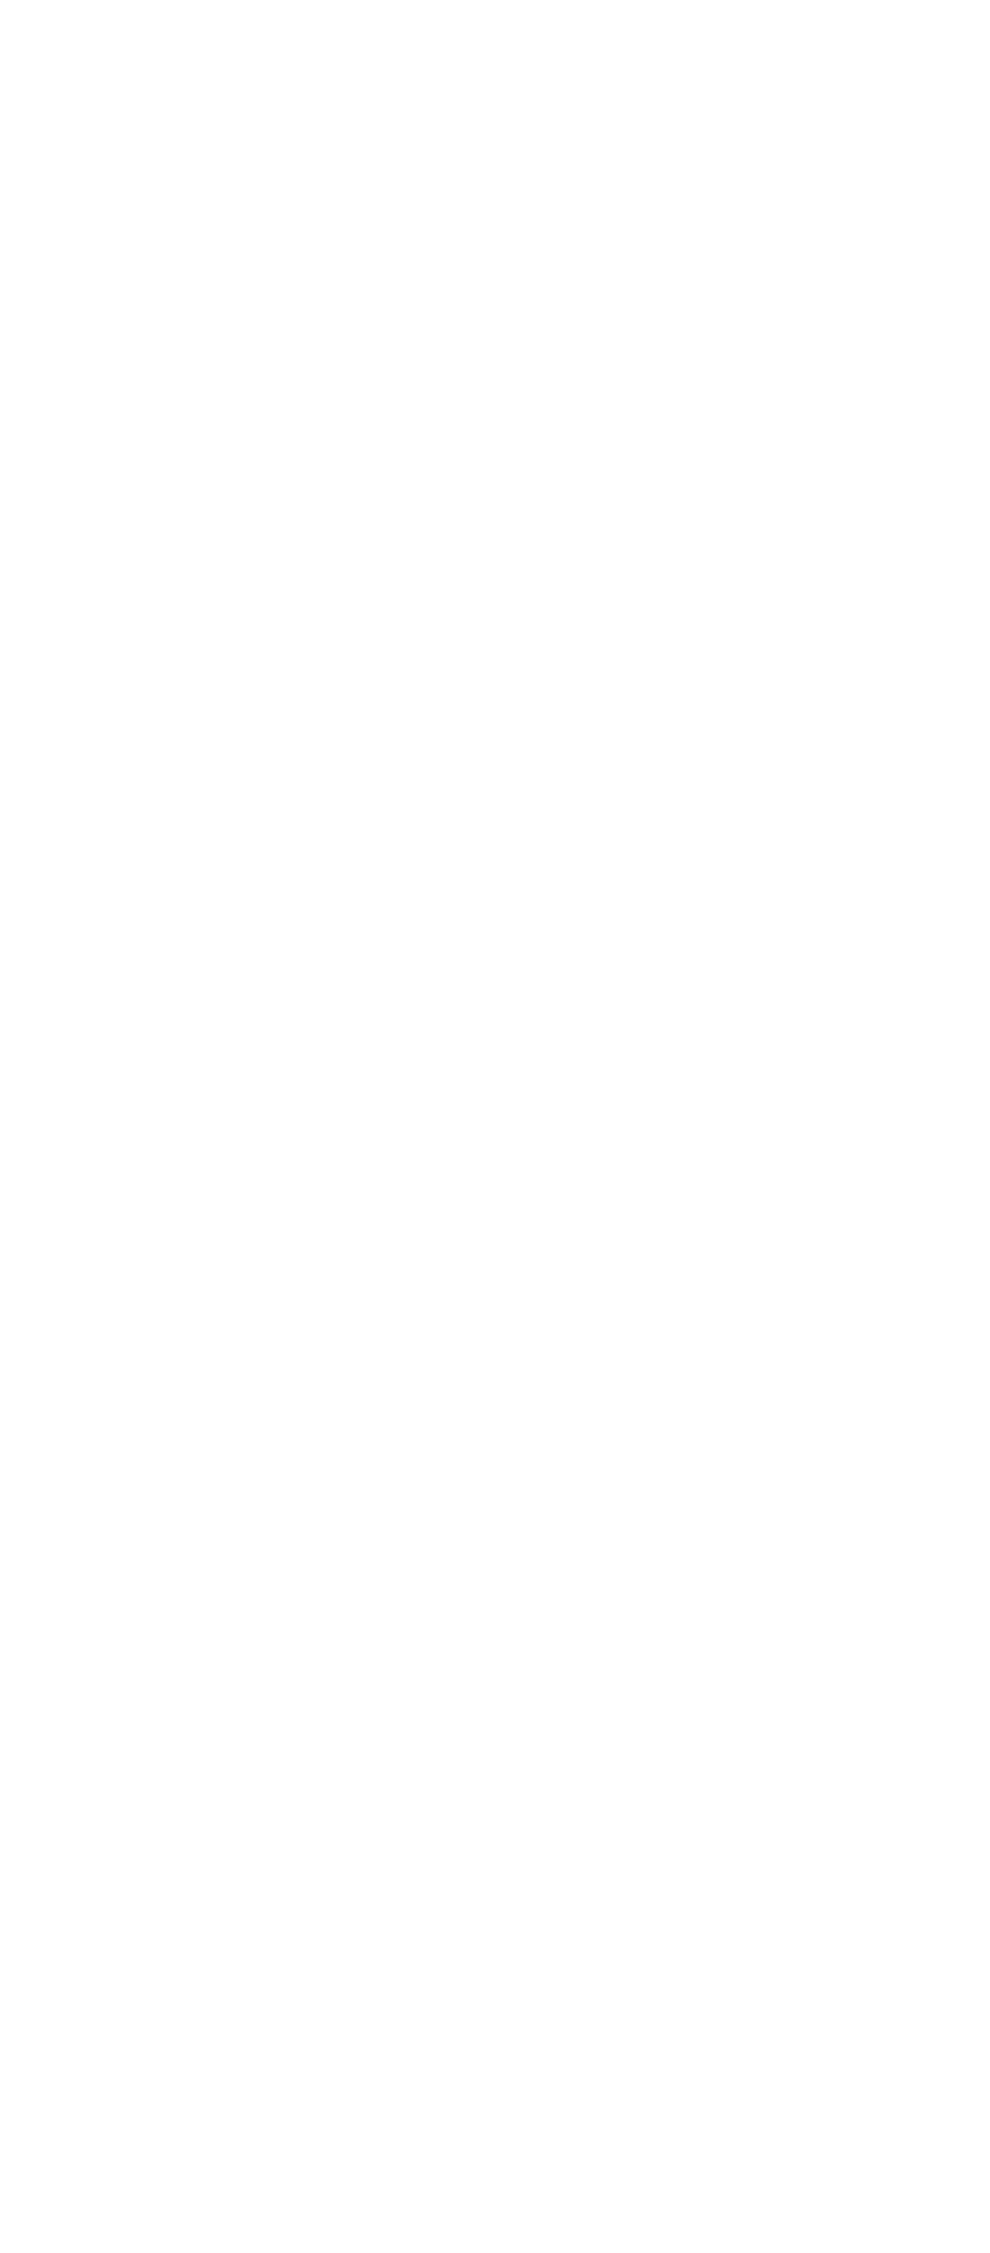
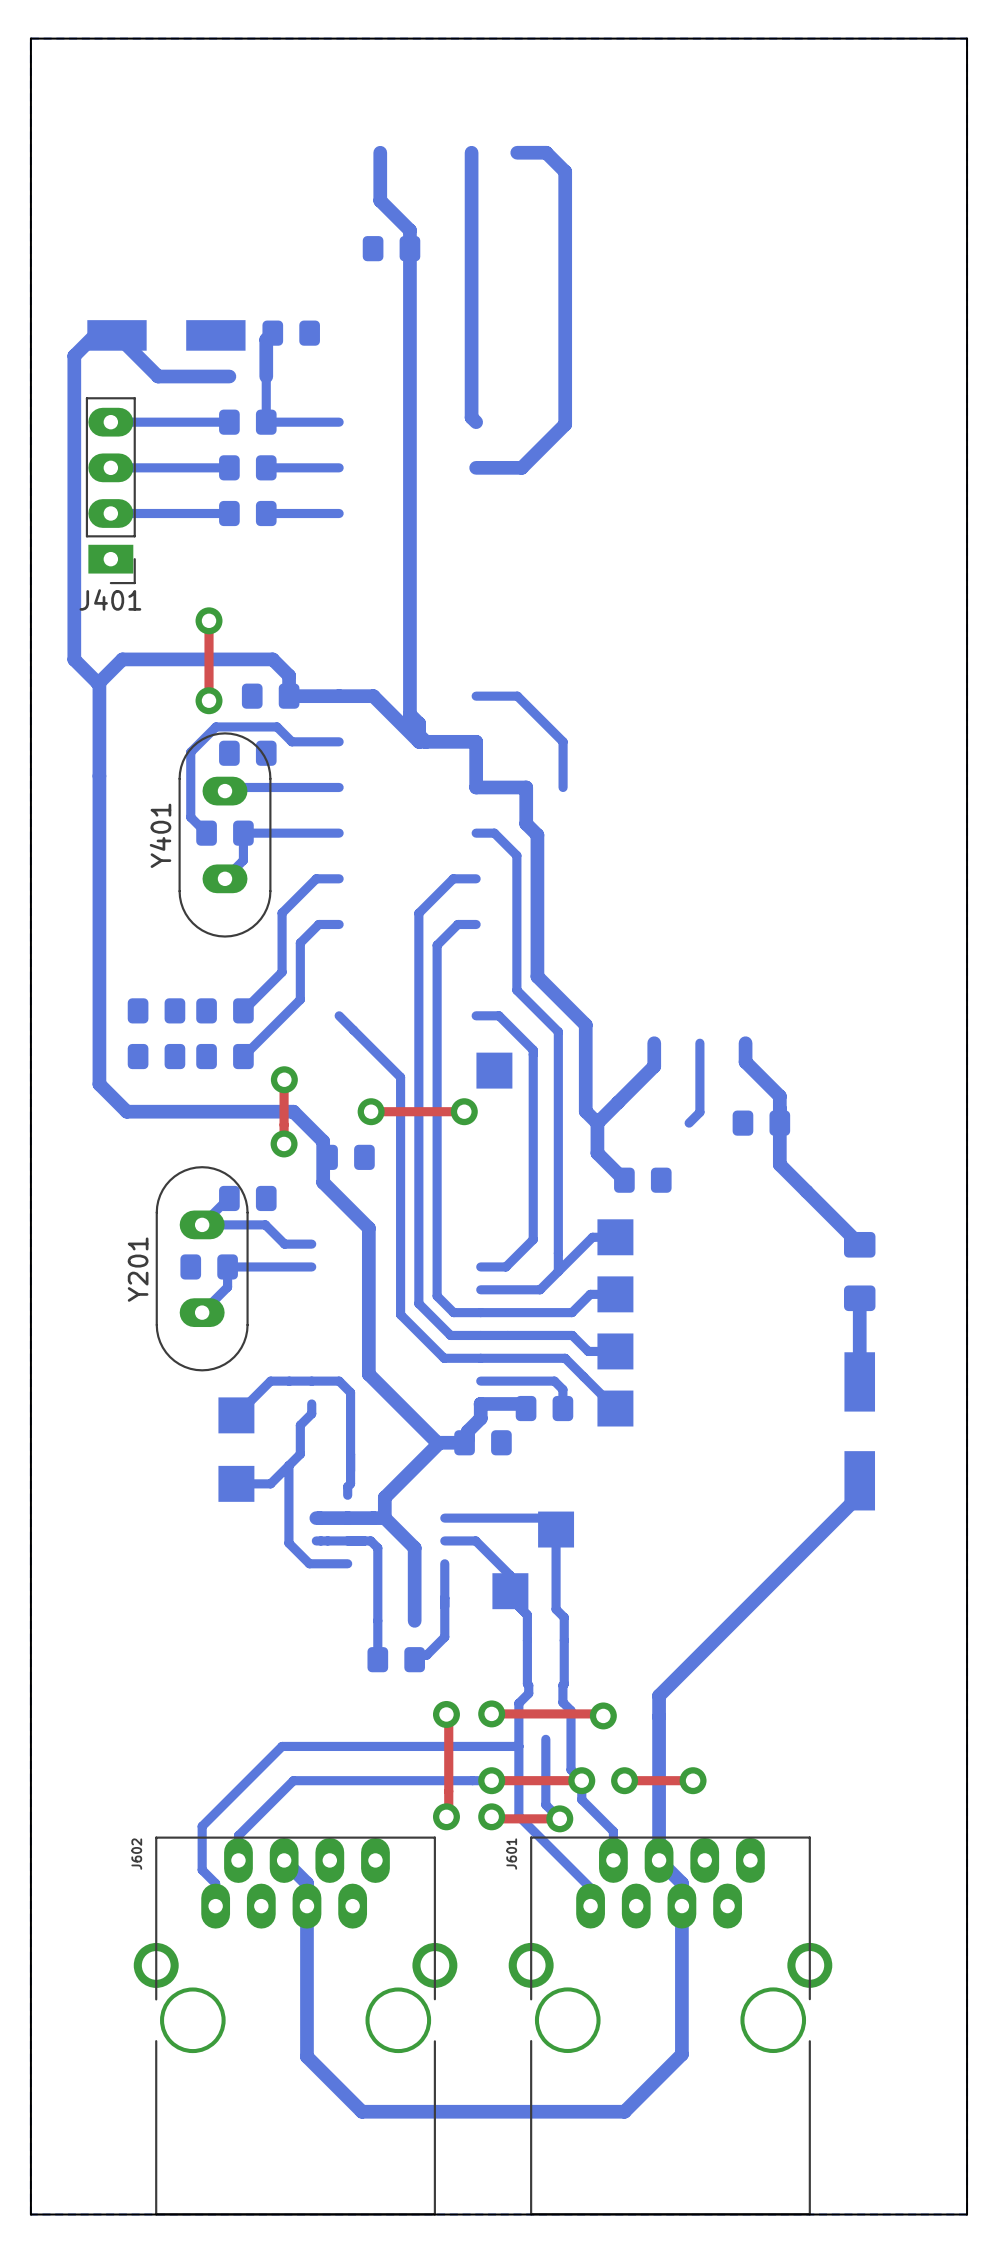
board edge: none -> (30, 38) (967, 38) (967, 2214) (30, 2214) (30, 38)
bottom track: none -> (380, 152) (380, 200) (409, 230) (409, 714) (419, 723) (419, 741)
bottom track: none -> (471, 152) (471, 417) (476, 422)
bottom track: none -> (517, 152) (546, 152) (565, 171) (565, 424) (521, 467) (476, 467)
part: none -> (391, 248)
bottom track: none -> (272, 333) (266, 339) (266, 422) (339, 422)
part: none -> (291, 333)
part: none -> (166, 335)
bottom track: none -> (229, 376) (158, 376) (116, 335) (94, 335) (74, 355) (74, 659) (97, 682) (99, 682)
bottom track: none -> (110, 422) (229, 422)
part: none -> (247, 422)
bottom track: none -> (110, 467) (229, 467)
part: none -> (247, 467)
bottom track: none -> (266, 467) (339, 467)
J401: none -> (110, 490)
bottom track: none -> (110, 513) (229, 513)
part: none -> (247, 513)
bottom track: none -> (266, 513) (339, 513)
top track: none -> (209, 620) (209, 700)
via: none -> (209, 620)
bottom track: none -> (99, 682) (99, 1084) (126, 1111) (293, 1111) (323, 1141) (323, 1182) (368, 1228) (368, 1374) (437, 1442) (464, 1442) (467, 1439) (467, 1431) (480, 1418) (480, 1403) (526, 1403)
bottom track: none -> (99, 682) (122, 659) (272, 659) (289, 675) (289, 696) (373, 696) (419, 741)
part: none -> (270, 696)
bottom track: none -> (476, 696) (517, 696) (563, 741) (563, 787)
via: none -> (209, 700)
bottom track: none -> (339, 741) (291, 741) (277, 726) (216, 726) (190, 752) (190, 817) (206, 833)
bottom track: none -> (419, 741) (476, 741) (476, 787) (526, 787) (526, 823) (537, 835) (537, 976) (585, 1024) (585, 1111) (597, 1123)
part: none -> (247, 753)
bottom track: none -> (228, 787) (339, 787)
part: none -> (224, 833)
bottom track: none -> (339, 833) (243, 833) (243, 860) (224, 878)
bottom track: none -> (476, 833) (494, 833) (516, 855) (516, 990) (558, 1031) (558, 1271)
Y401: none -> (224, 834)
bottom track: none -> (339, 878) (316, 878) (282, 913) (282, 972) (243, 1010)
bottom track: none -> (476, 878) (453, 878) (418, 913) (418, 1303) (450, 1335) (572, 1335) (588, 1351) (615, 1351)
bottom track: none -> (339, 924) (318, 924) (300, 942) (300, 999) (243, 1056)
bottom track: none -> (476, 924) (457, 924) (437, 945) (437, 1296) (453, 1312) (572, 1312) (590, 1294) (615, 1294)
part: none -> (156, 1010)
part: none -> (224, 1010)
bottom track: none -> (339, 1015) (400, 1077) (400, 1314) (444, 1358) (565, 1358) (615, 1408)
bottom track: none -> (476, 1015) (498, 1015) (533, 1050) (533, 1239) (505, 1266) (480, 1266)
bottom track: none -> (654, 1043) (654, 1066) (597, 1123)
bottom track: none -> (699, 1043) (699, 1112) (689, 1123)
bottom track: none -> (745, 1043) (745, 1062) (779, 1096) (779, 1164) (859, 1244)
part: none -> (156, 1056)
part: none -> (224, 1056)
part: none -> (494, 1070)
top track: none -> (284, 1079) (284, 1143)
via: none -> (284, 1079)
top track: none -> (371, 1111) (464, 1111)
via: none -> (371, 1111)
via: none -> (464, 1111)
bottom track: none -> (597, 1123) (597, 1153) (624, 1180)
part: none -> (761, 1123)
via: none -> (284, 1143)
part: none -> (346, 1157)
part: none -> (642, 1180)
bottom track: none -> (229, 1198) (202, 1224) (265, 1224) (284, 1244) (311, 1244)
part: none -> (247, 1198)
bottom track: none -> (615, 1237) (592, 1237) (540, 1289) (480, 1289)
part: none -> (615, 1237)
part: none -> (209, 1266)
bottom track: none -> (311, 1266) (227, 1266) (227, 1287) (202, 1312)
Y201: none -> (202, 1268)
part: none -> (859, 1271)
part: none -> (615, 1294)
bottom track: none -> (859, 1298) (859, 1381)
part: none -> (615, 1351)
bottom track: none -> (480, 1381) (554, 1381) (562, 1389) (562, 1403)
bottom track: none -> (311, 1403) (311, 1413) (300, 1425) (300, 1454) (270, 1483) (236, 1483)
part: none -> (544, 1408)
part: none -> (615, 1408)
bottom track: none -> (236, 1415) (270, 1381) (339, 1381) (350, 1392) (350, 1483) (347, 1486) (347, 1495)
part: none -> (236, 1415)
part: none -> (859, 1431)
bottom track: none -> (439, 1442) (384, 1497) (384, 1518)
part: none -> (483, 1442)
bottom track: none -> (288, 1465) (288, 1543) (309, 1563) (347, 1563)
bottom track: none -> (859, 1480) (859, 1495) (659, 1695) (659, 1860) (681, 1883) (681, 2054) (624, 2111) (361, 2111) (306, 2056) (306, 1883) (284, 1860)
part: none -> (236, 1483)
bottom track: none -> (316, 1518) (384, 1518)
bottom track: none -> (384, 1518) (414, 1547) (414, 1620)
bottom track: none -> (444, 1518) (544, 1518) (556, 1529) (556, 1609) (564, 1617) (562, 1702) (571, 1710) (571, 1769) (581, 1780)
part: none -> (556, 1529)
bottom track: none -> (316, 1540) (370, 1540) (377, 1548) (377, 1655)
bottom track: none -> (444, 1540) (475, 1540) (510, 1575) (510, 1598) (527, 1615) (528, 1693) (518, 1703) (518, 1816) (590, 1888) (590, 1906)
bottom track: none -> (444, 1563) (444, 1637) (426, 1655) (414, 1655)
part: none -> (510, 1591)
part: none -> (396, 1659)
top track: none -> (446, 1709) (448, 1712) (448, 1810)
top track: none -> (491, 1713) (601, 1713) (603, 1715)
via: none -> (491, 1713)
via: none -> (446, 1714)
via: none -> (603, 1715)
bottom track: none -> (545, 1739) (545, 1804) (559, 1818)
bottom track: none -> (518, 1746) (282, 1746) (202, 1826) (202, 1870) (215, 1883) (215, 1906)
bottom track: none -> (581, 1777) (581, 1799) (613, 1831) (613, 1860)
top track: none -> (491, 1780) (581, 1780)
bottom track: none -> (491, 1780) (293, 1780) (238, 1835) (238, 1860)
via: none -> (491, 1780)
via: none -> (581, 1780)
top track: none -> (624, 1780) (693, 1780)
via: none -> (624, 1780)
via: none -> (693, 1780)
via: none -> (446, 1816)
top track: none -> (491, 1816) (493, 1818) (559, 1818)
via: none -> (491, 1816)
via: none -> (559, 1818)
J601: none -> (670, 2025)
J602: none -> (295, 2026)

